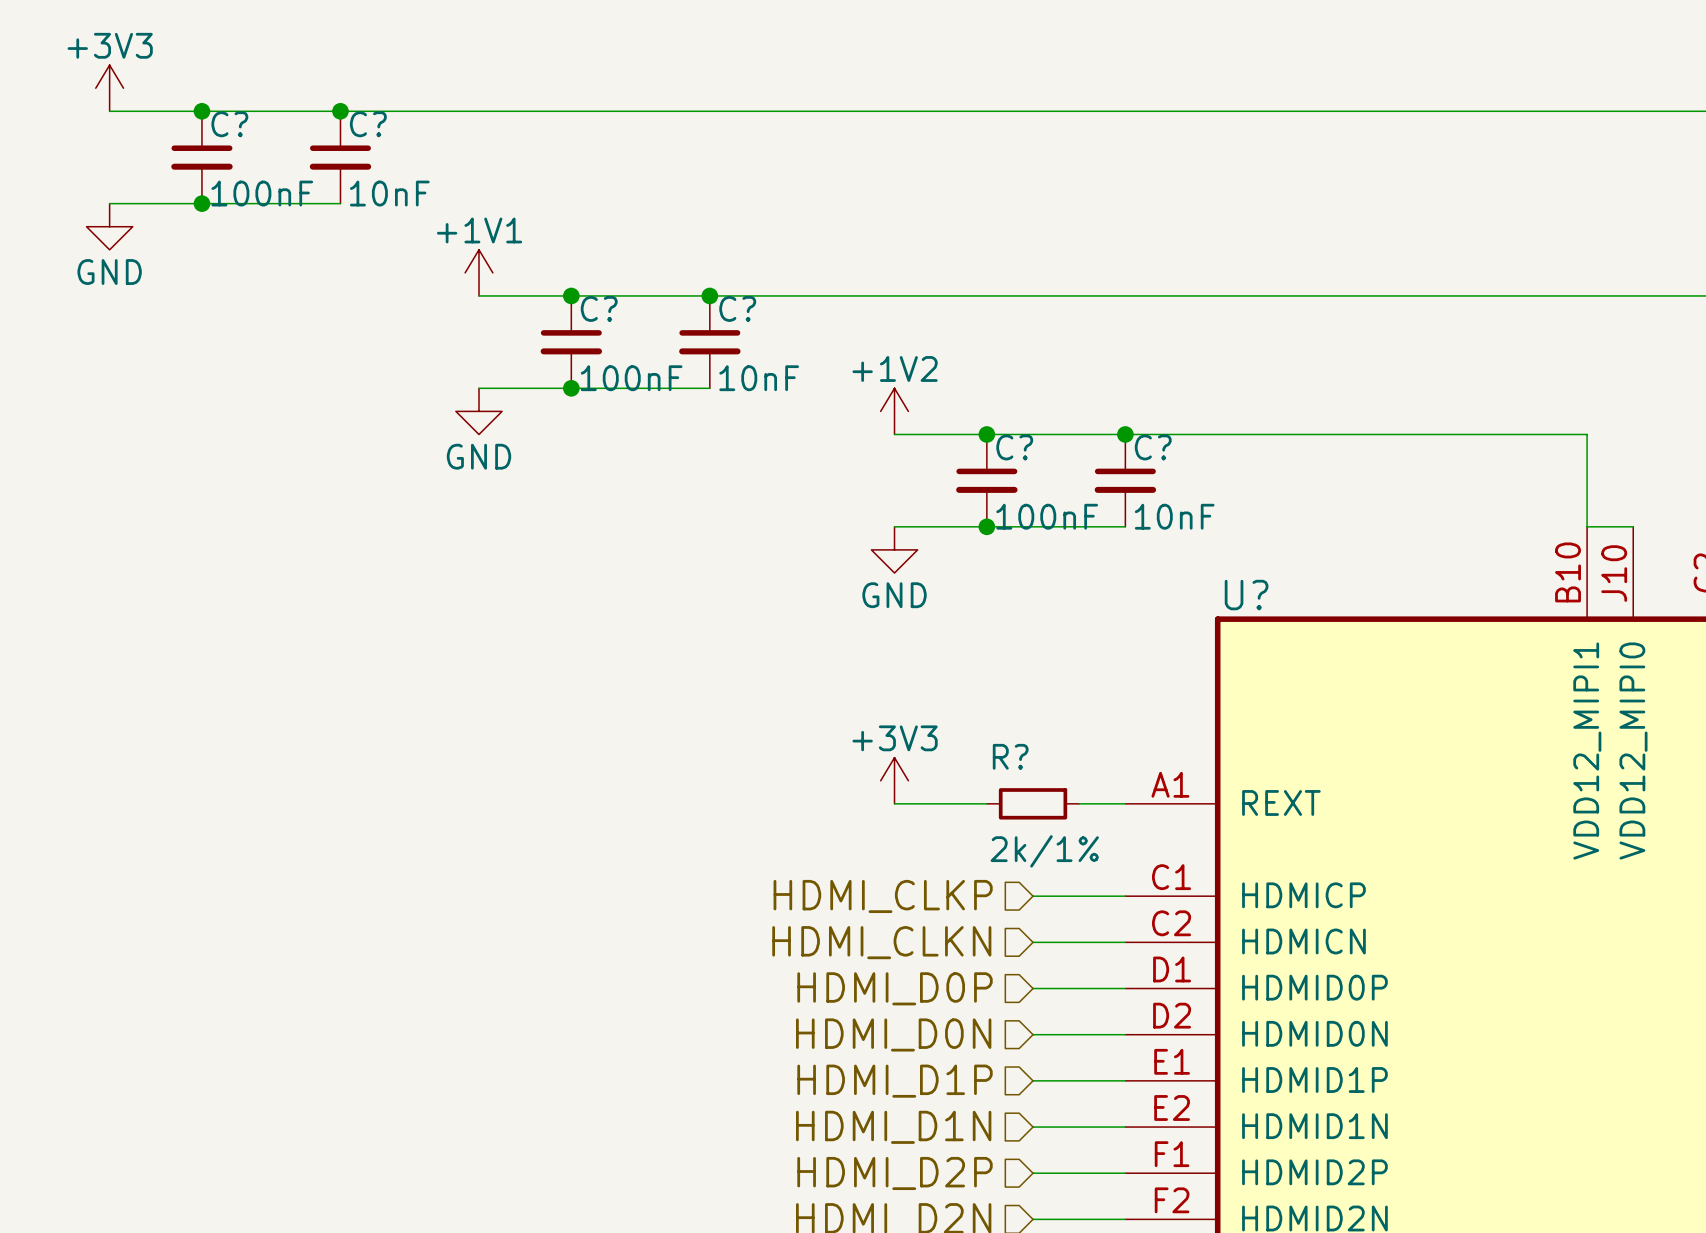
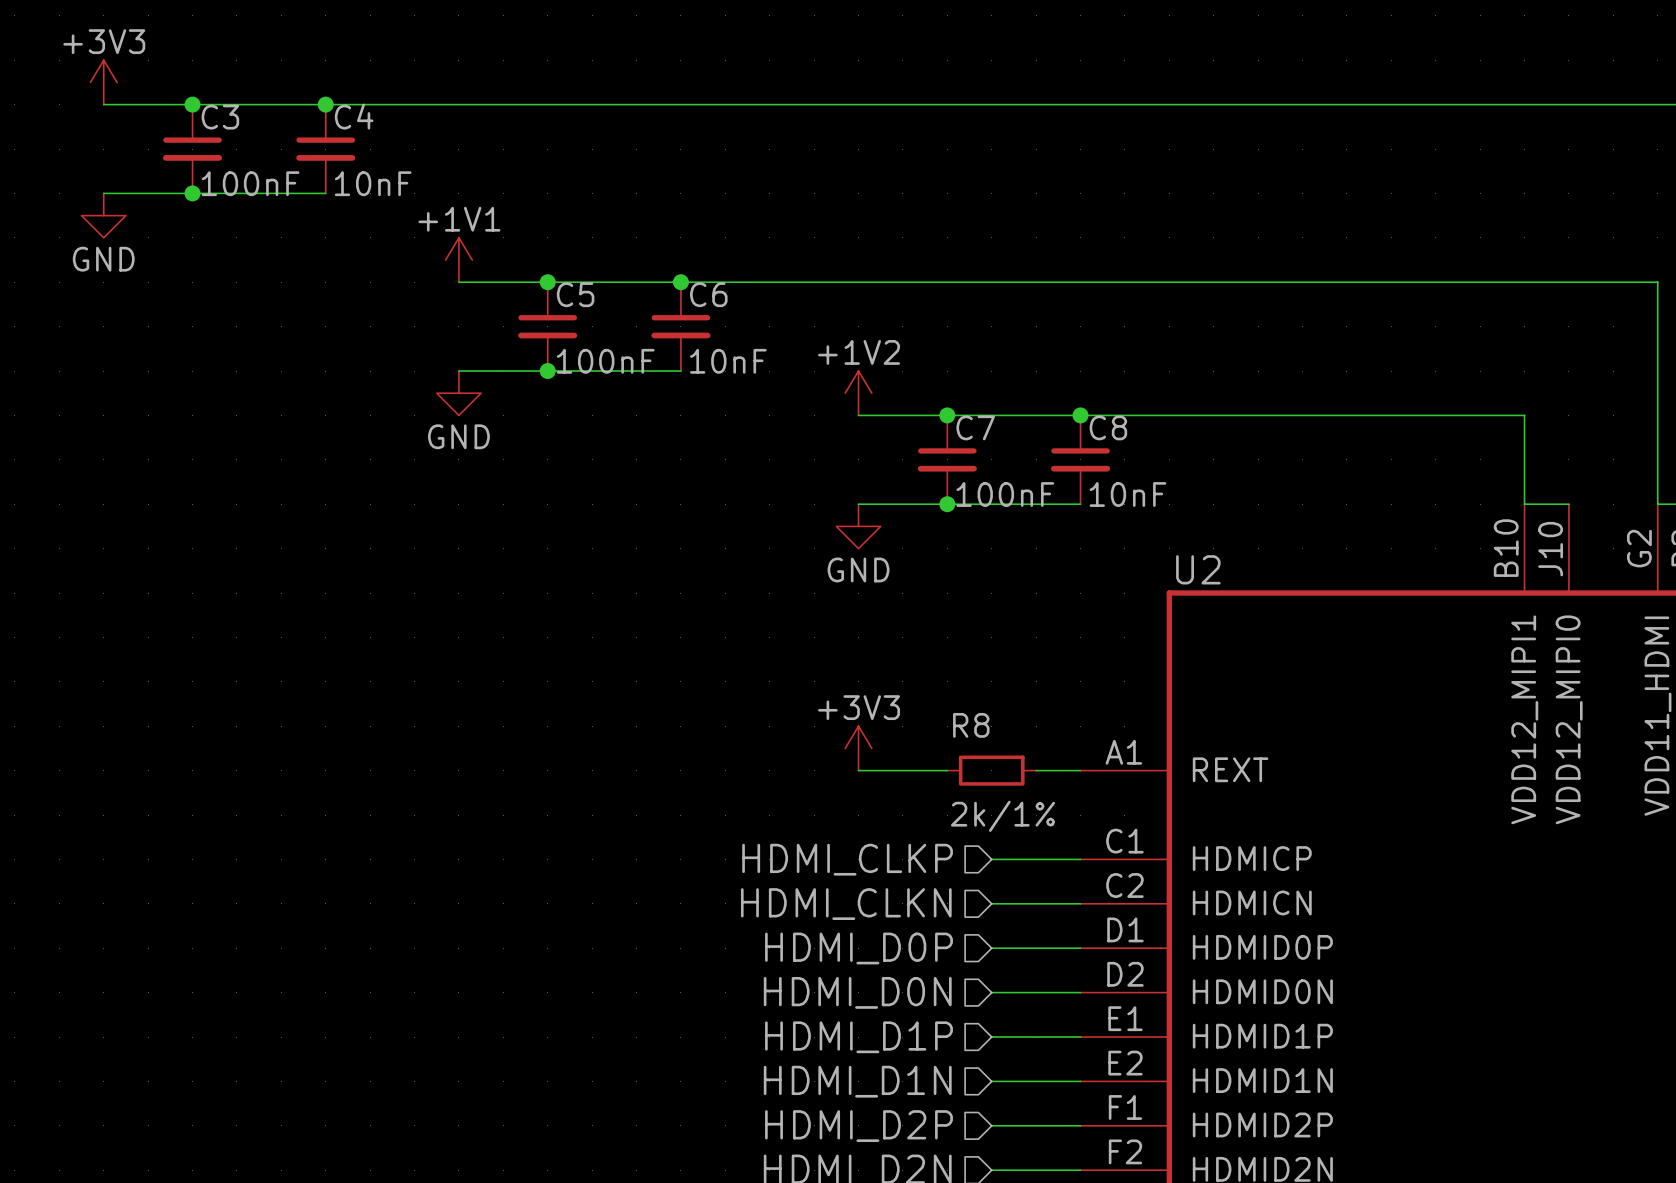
C? name: C? (229, 124) -> C3 (220, 117)
C? name: C? (368, 124) -> C4 (354, 116)
C? name: C? (599, 308) -> C5 (575, 294)
C? name: C? (737, 308) -> C6 (708, 294)
C? name: C? (1014, 447) -> C7 (975, 427)
C? name: C? (1153, 447) -> C8 (1108, 427)
U? name: U? (1246, 595) -> U2 (1198, 569)
R? name: R? (1010, 756) -> R8 (971, 725)

